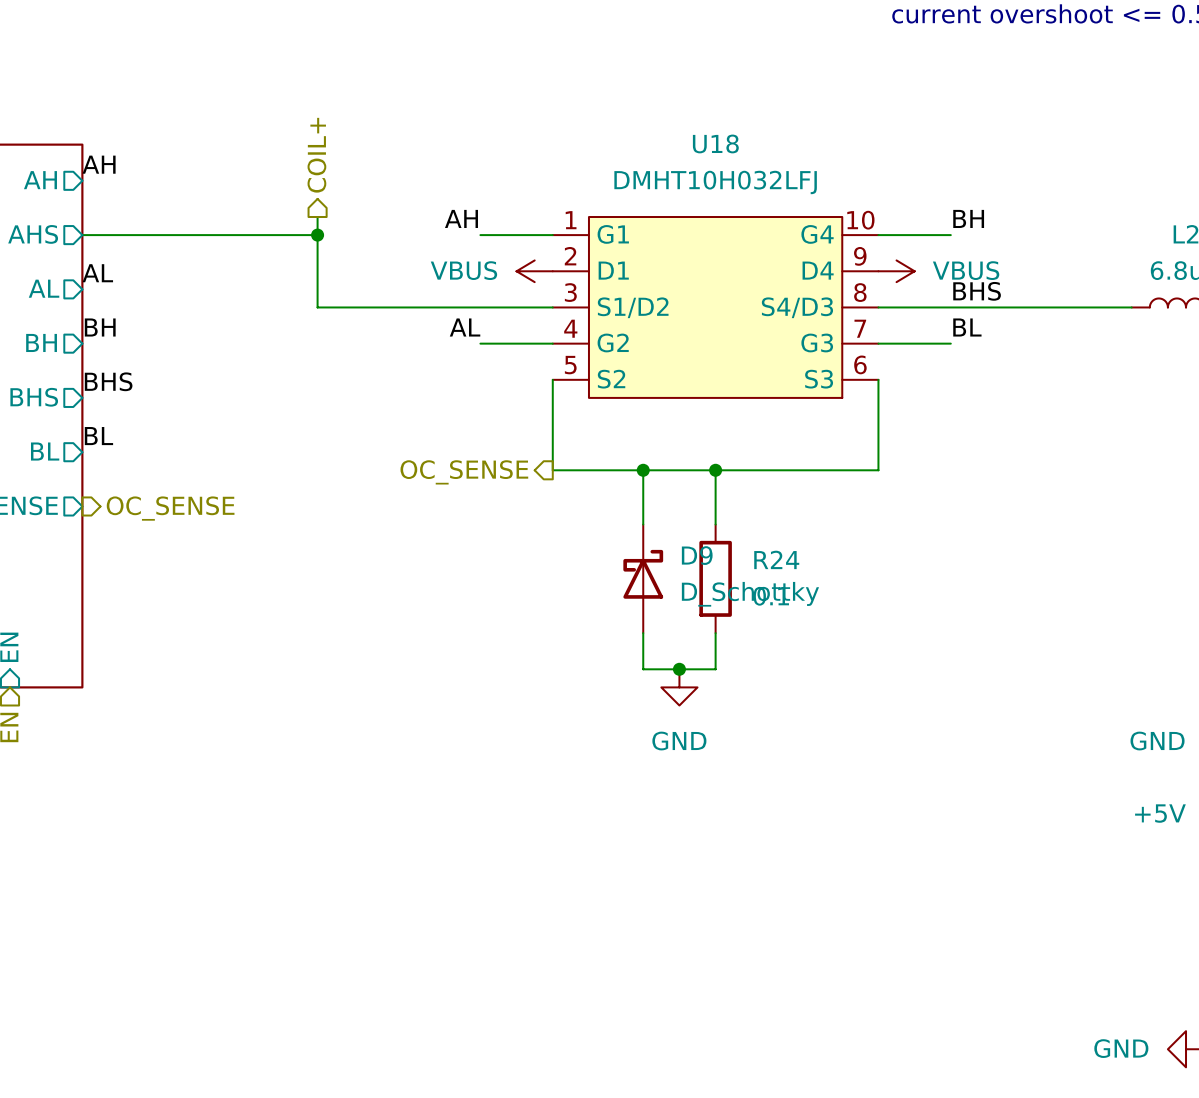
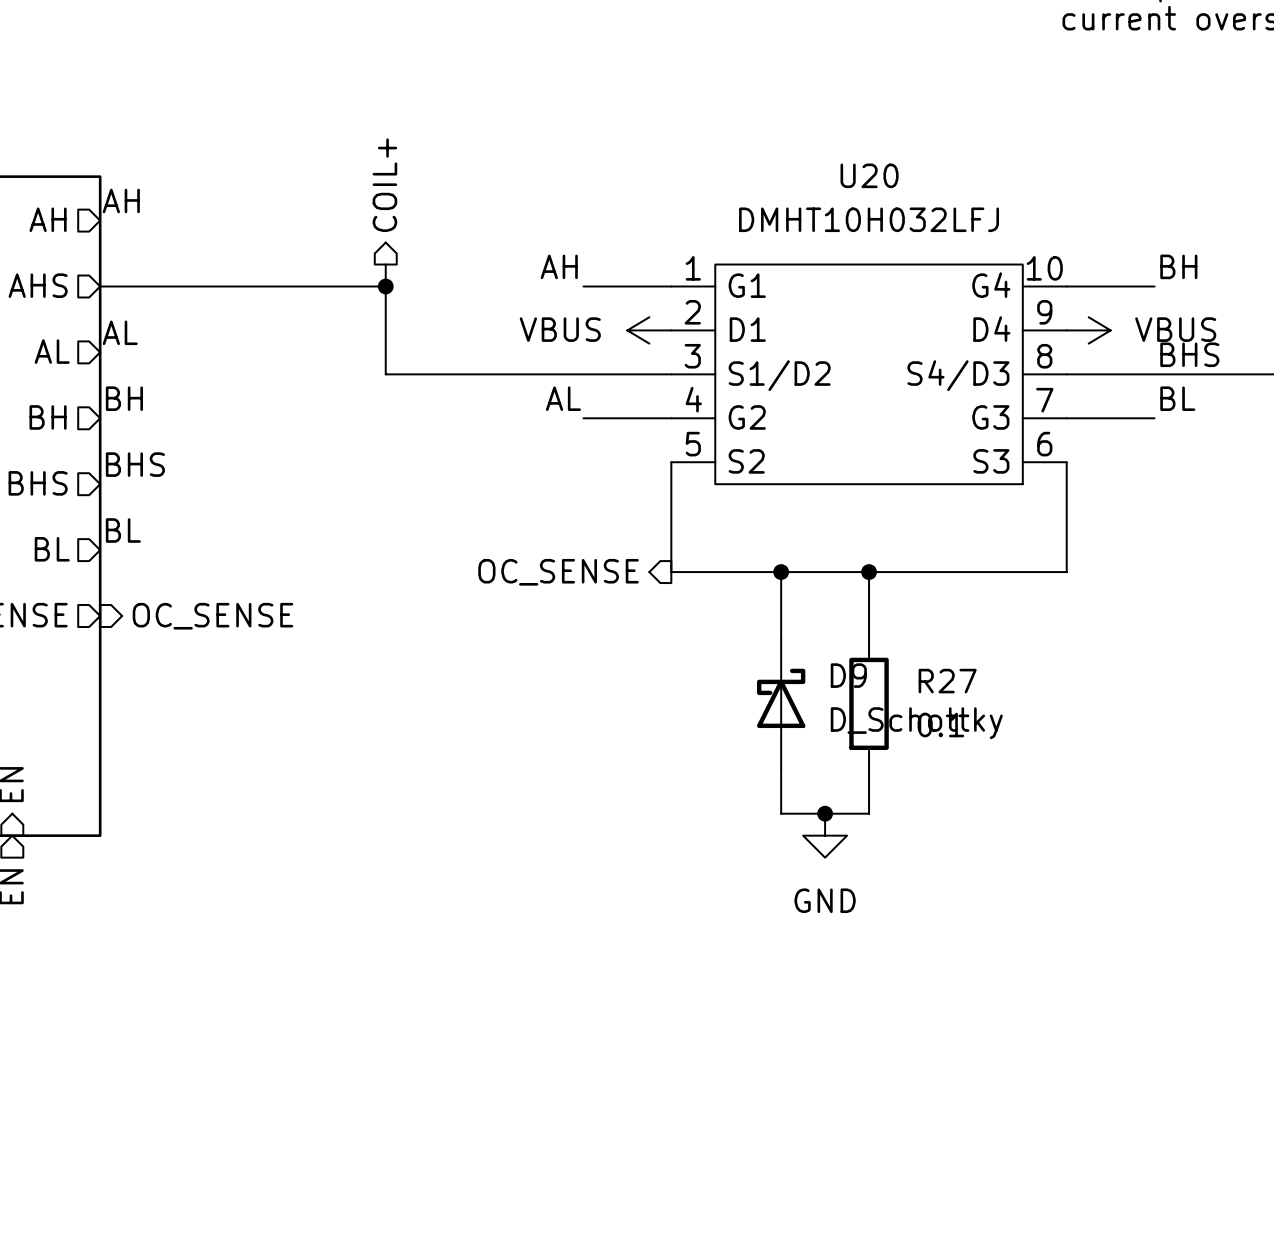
U18 name: U18 (715, 143) -> U20 (869, 175)
R24 name: R24 (776, 559) -> R27 (947, 681)

